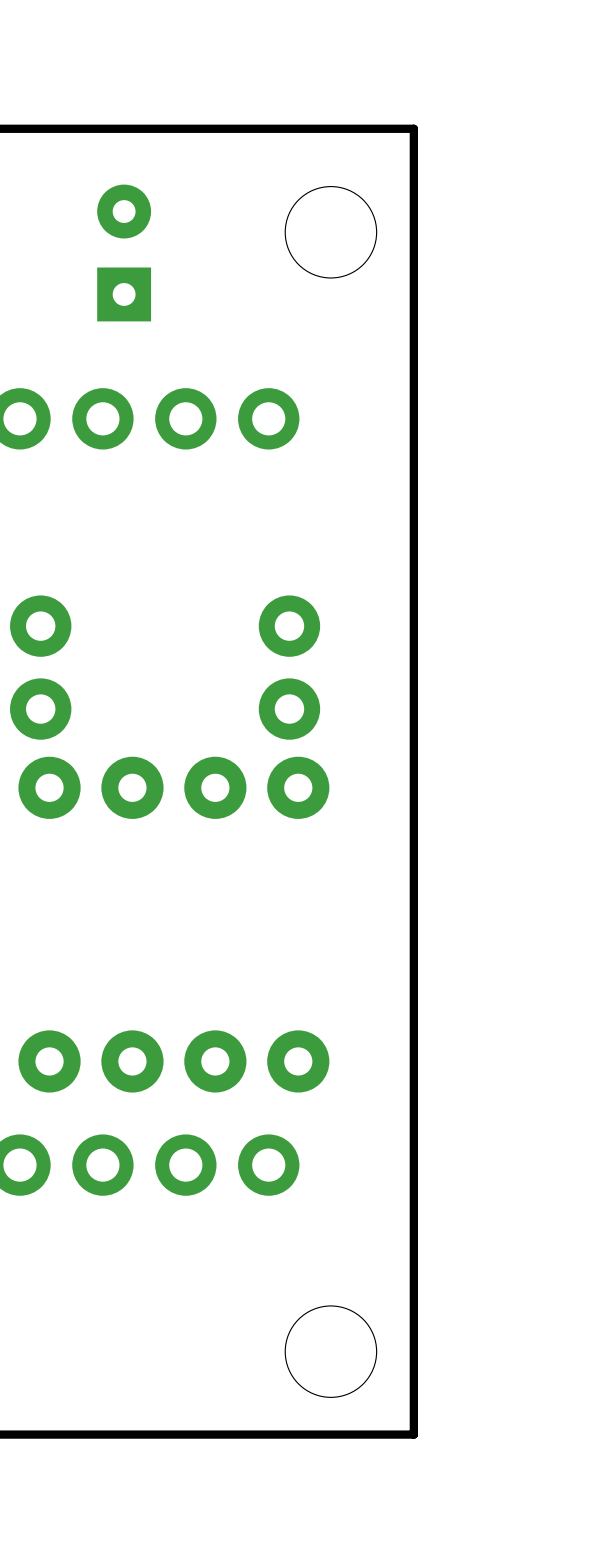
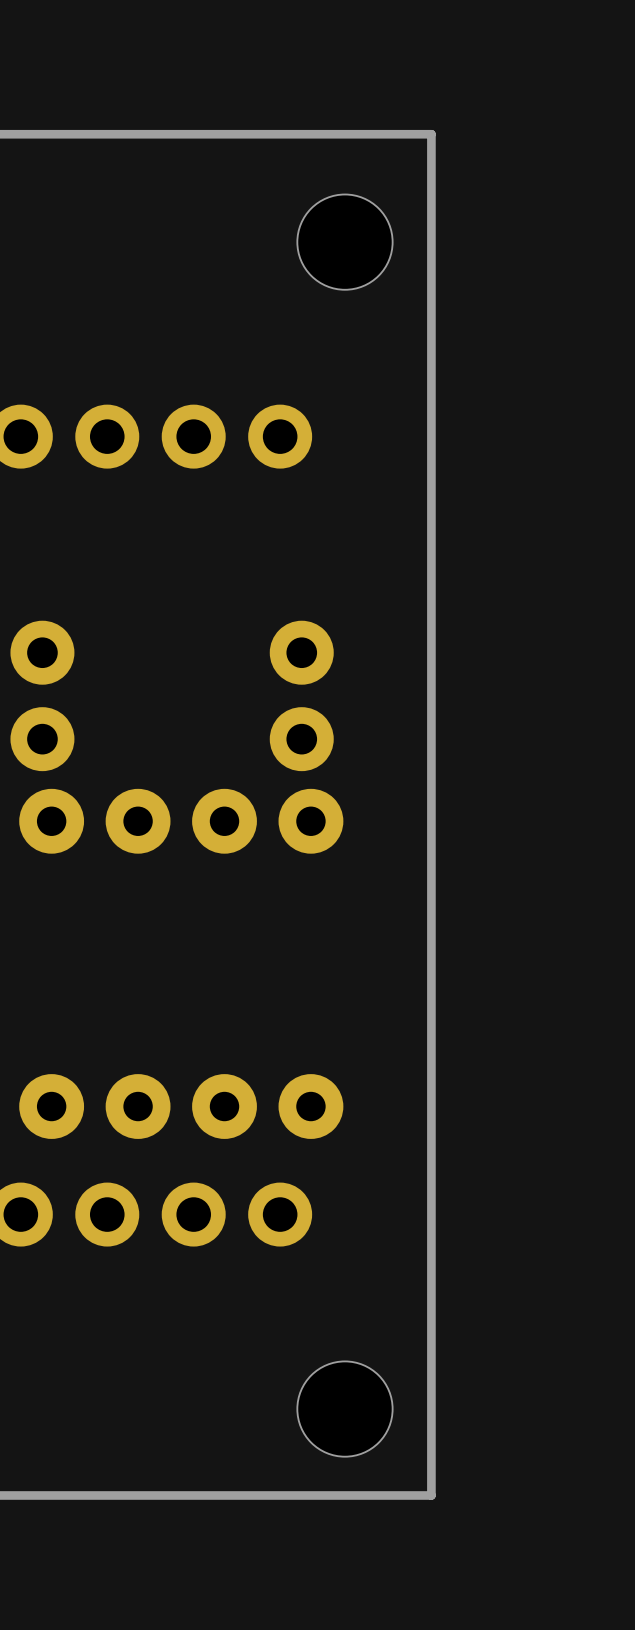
part: (124, 253) -> none

